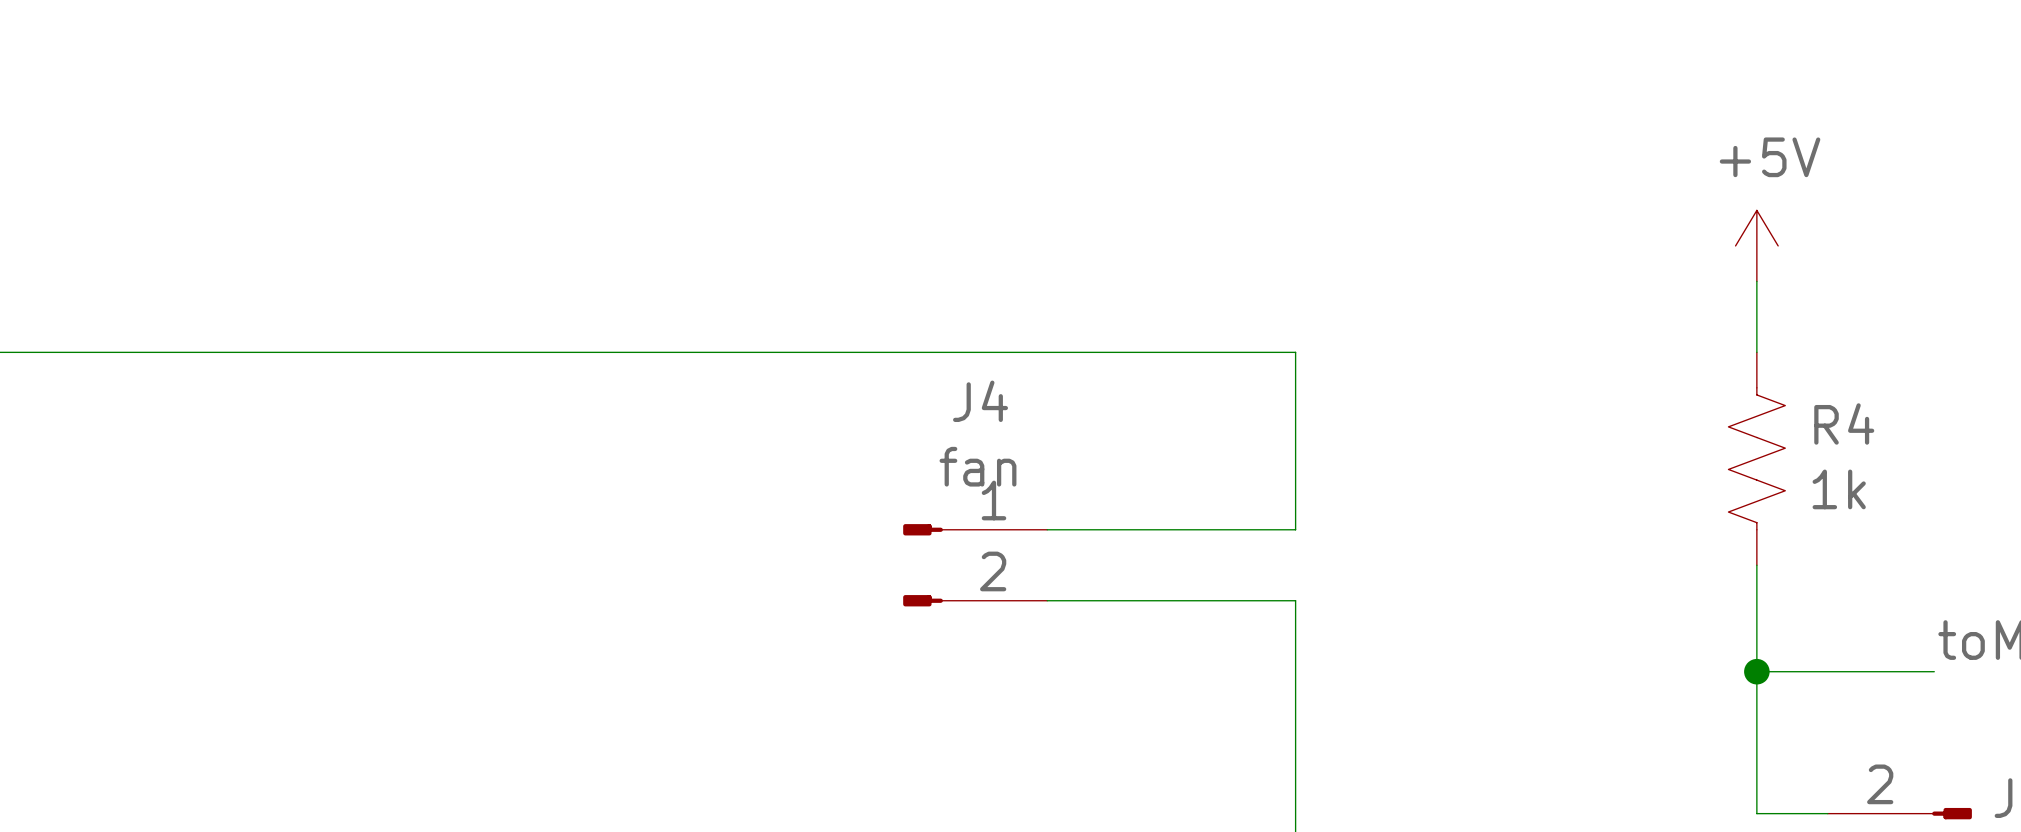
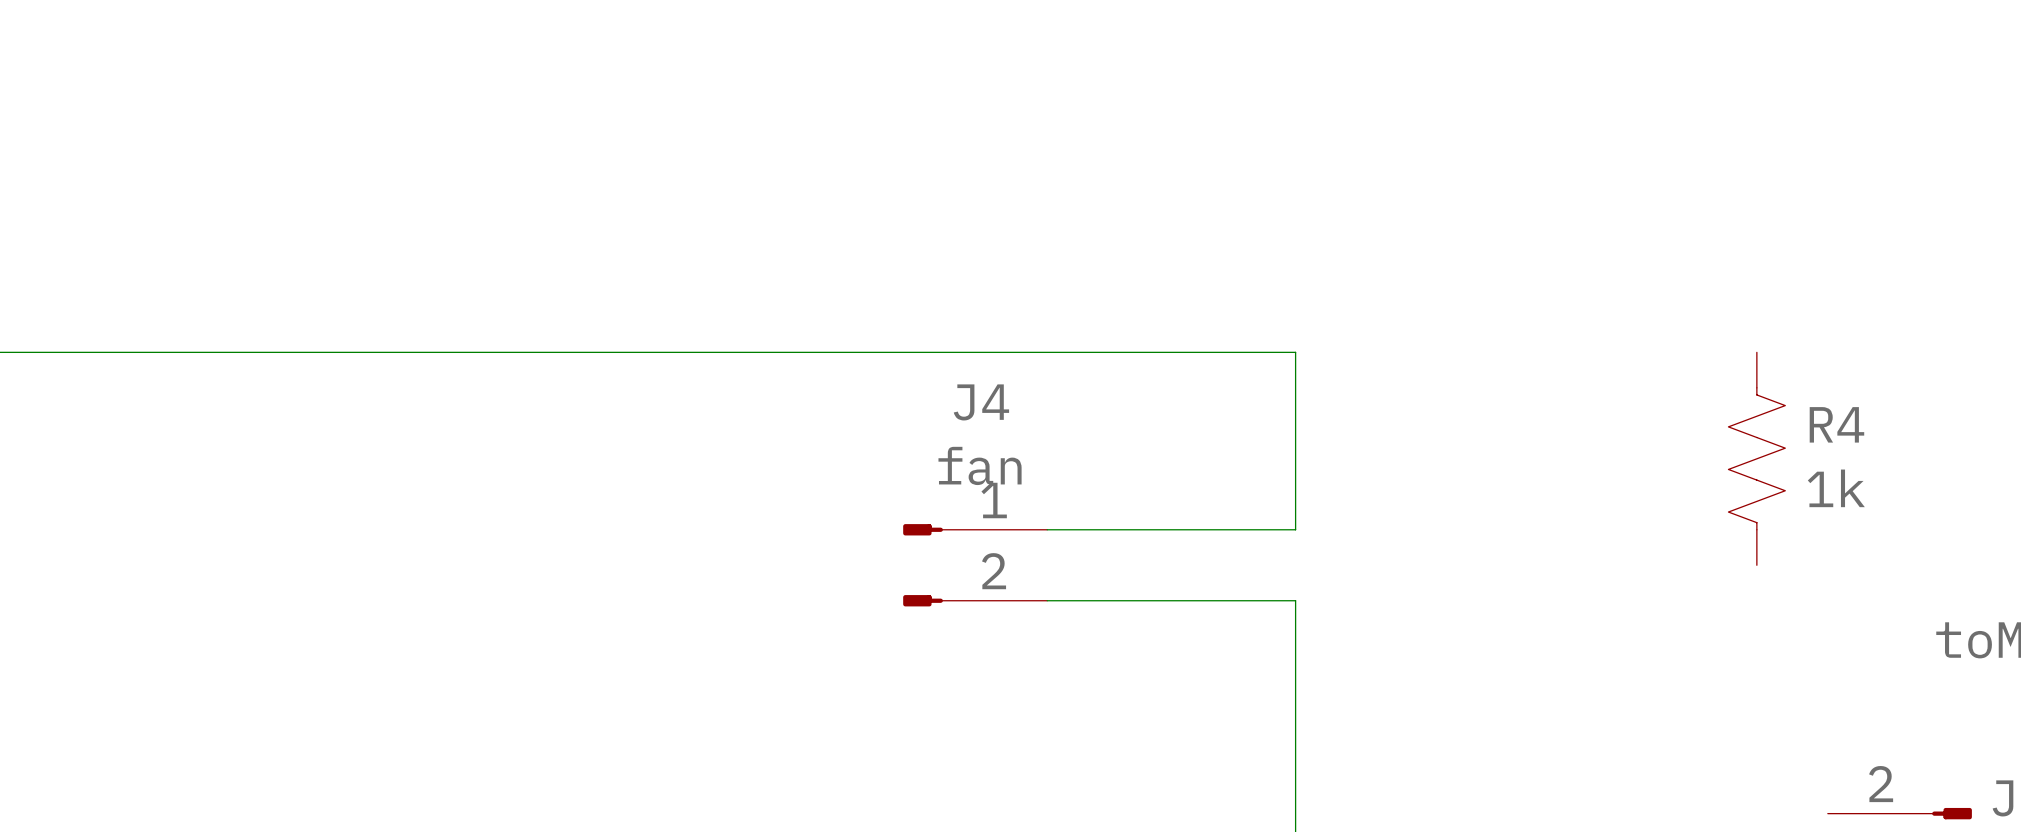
power symbol: +5V (1756, 245) -> none
wire: (1756, 281) (1756, 352) -> none
wire: (1756, 565) (1756, 813) (1827, 813) -> none
wire: (1756, 671) (1934, 671) -> none
junction: (1756, 671) -> none

